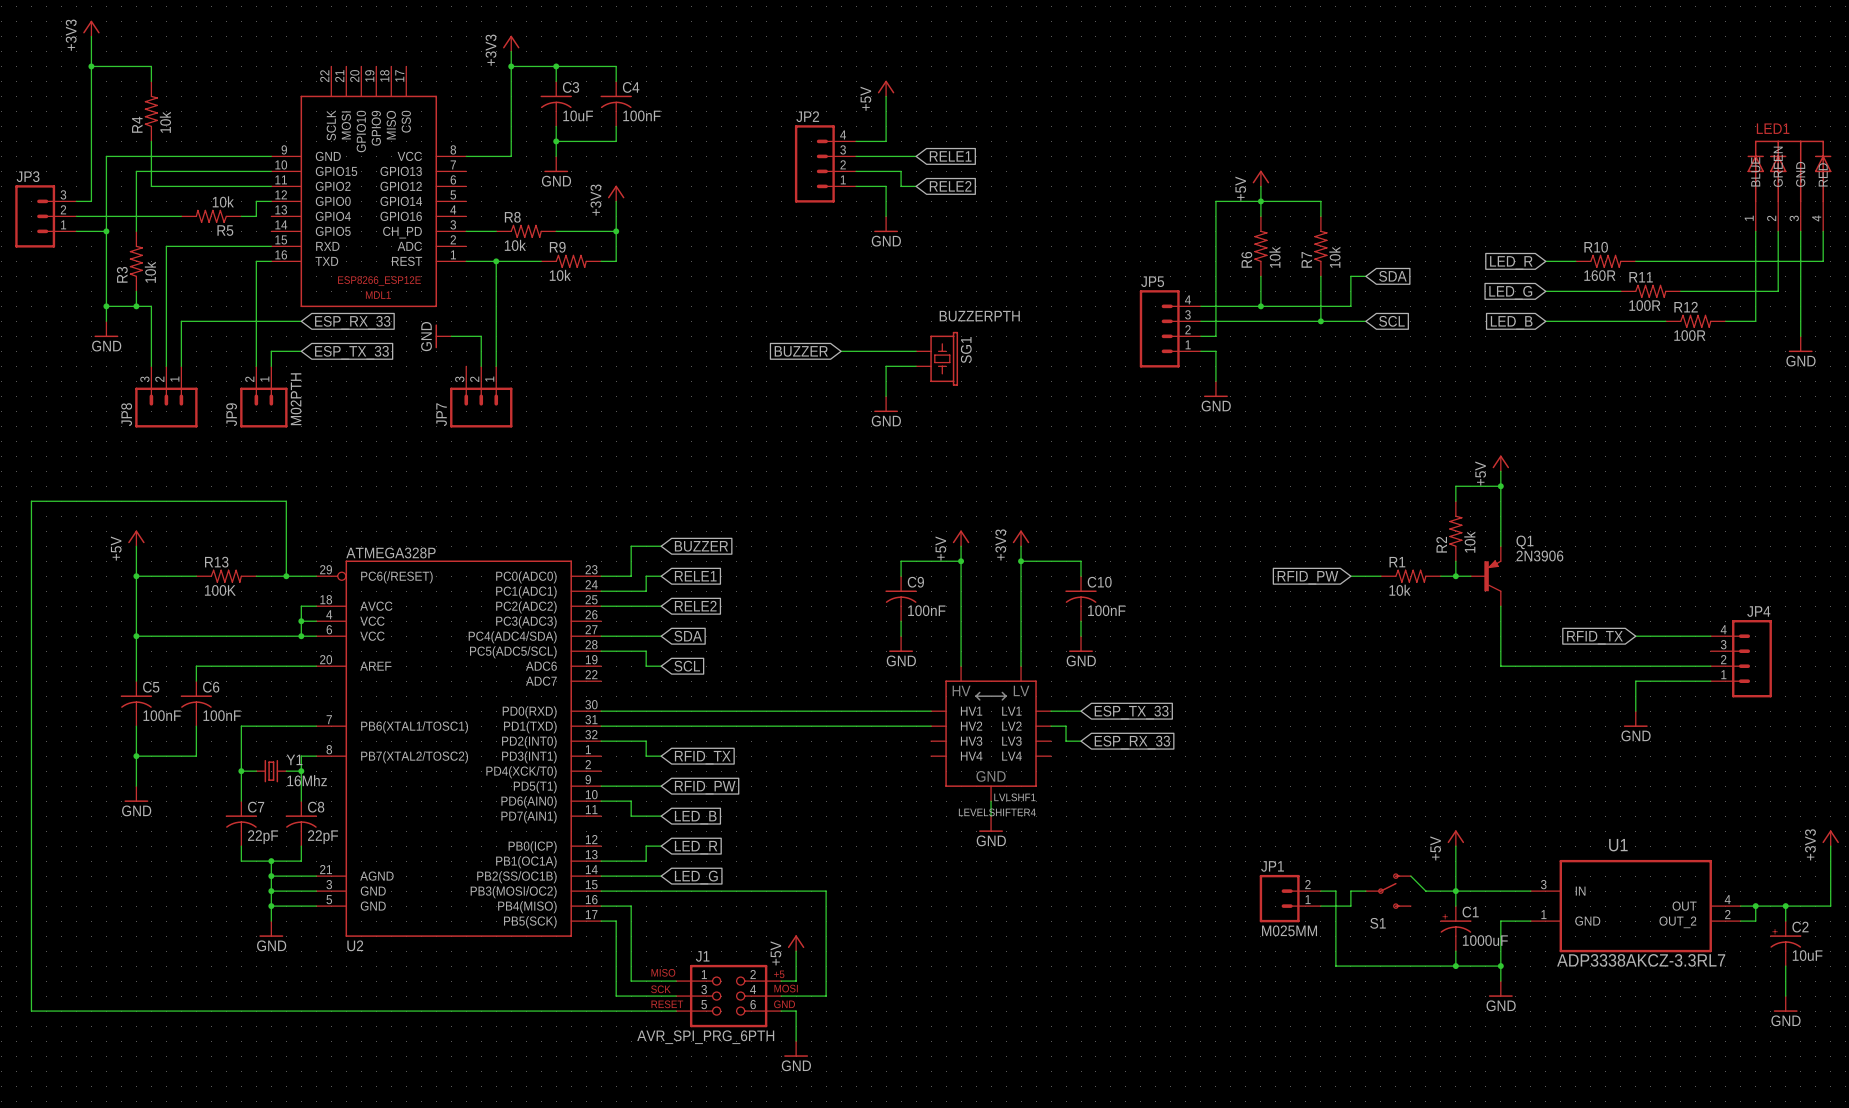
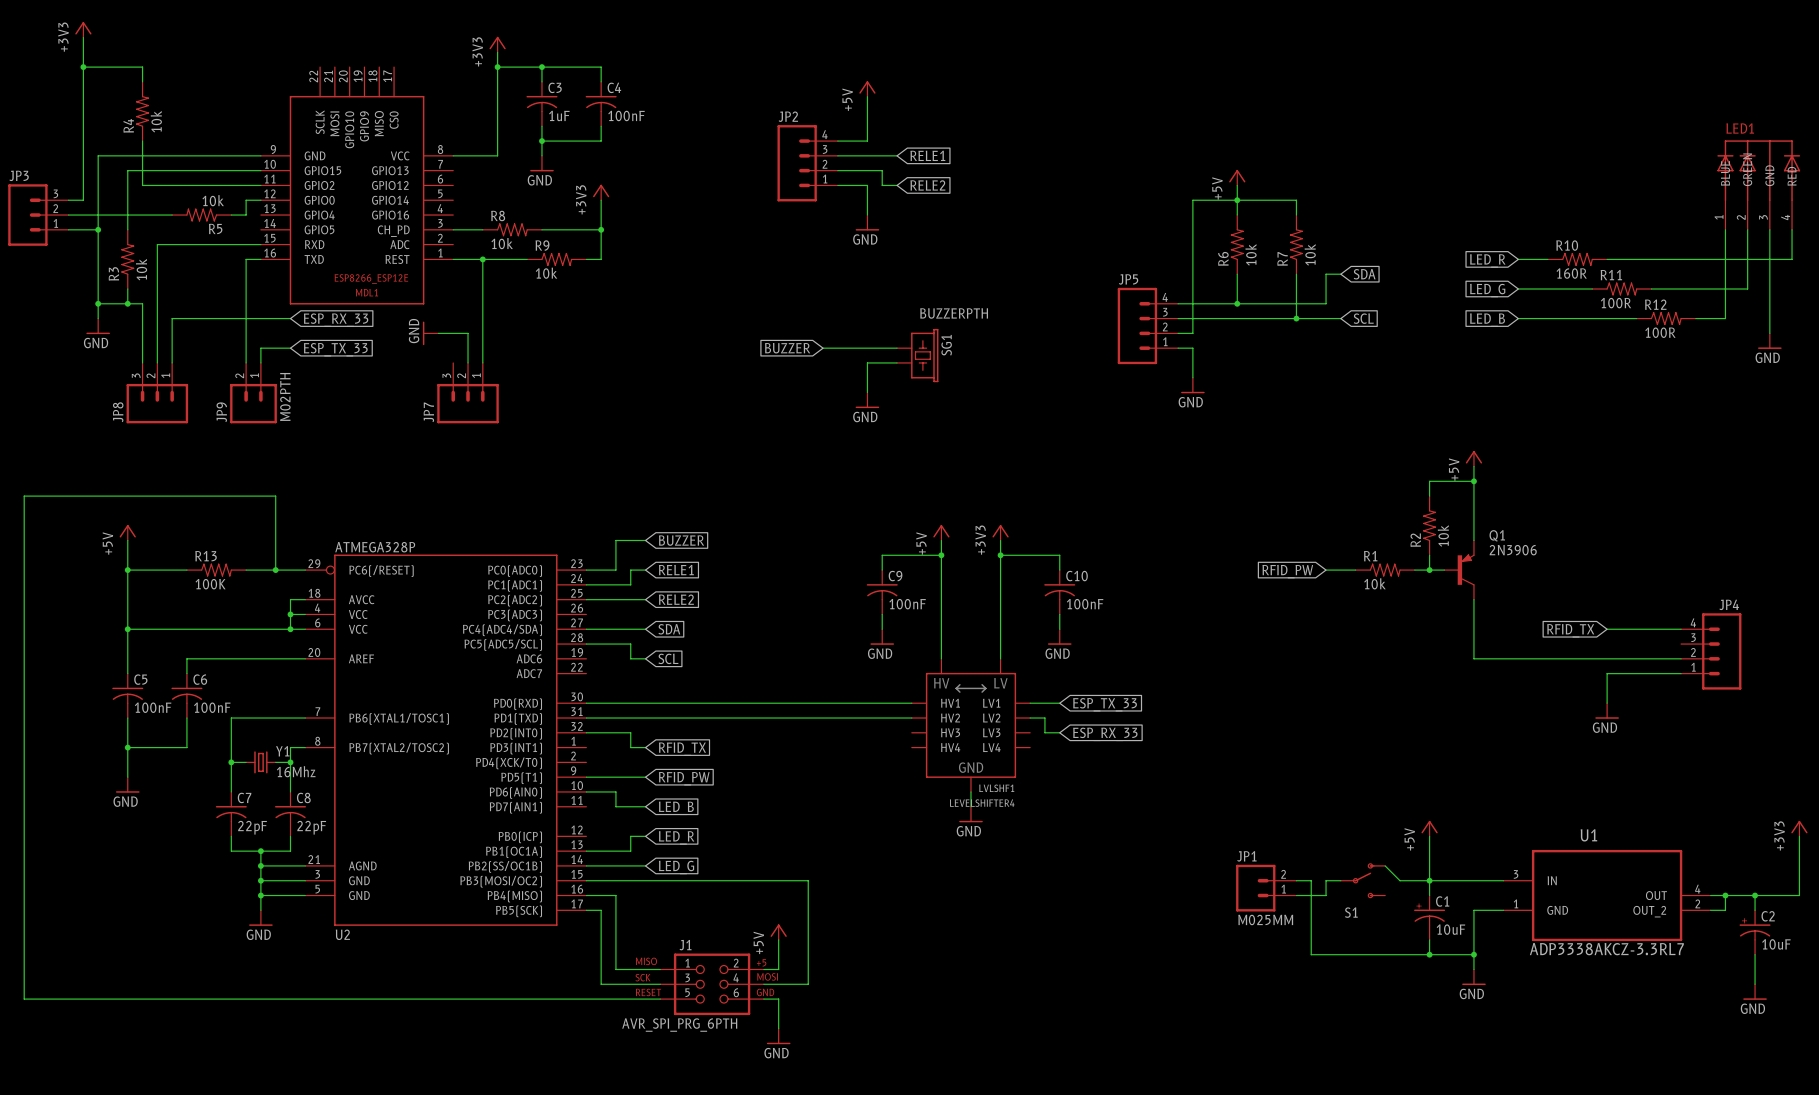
C3 value: 10uF (578, 115) -> 1uF (559, 115)
C1 value: 1000uF (1485, 940) -> 10uF (1450, 929)

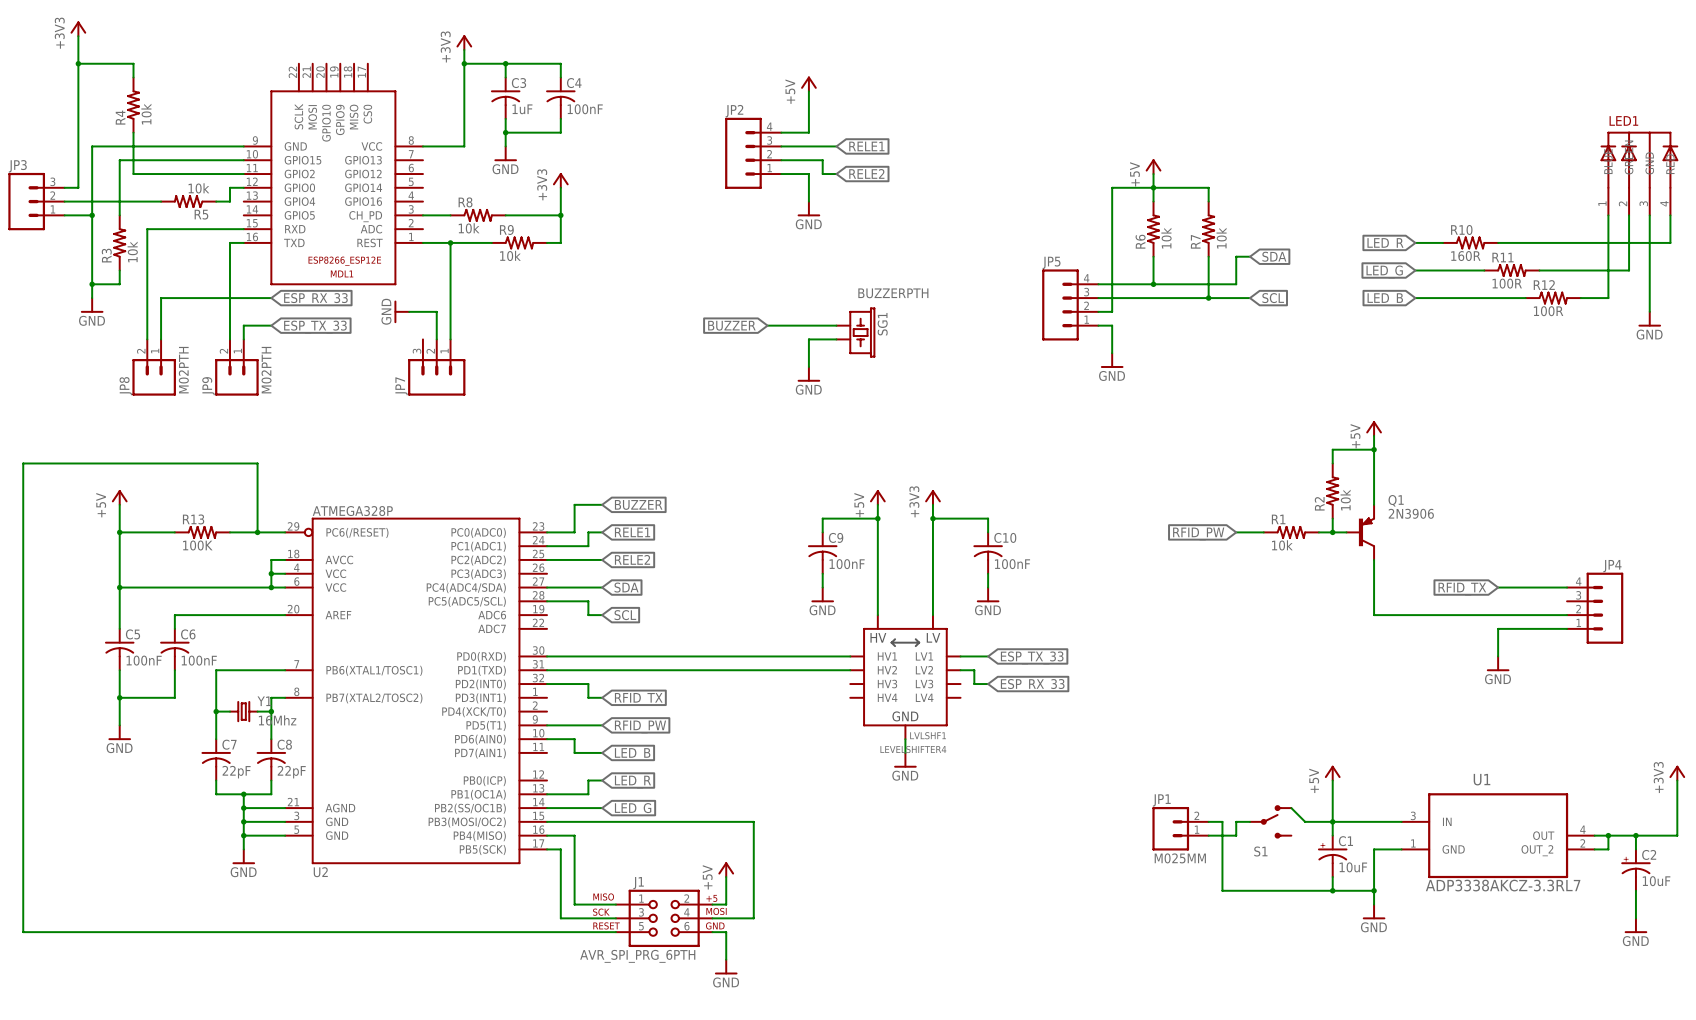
wire: (127, 303) (142, 303) (142, 362) -> none
junction: (127, 303) -> none
JP8 symbol: [126, 362, 189, 424] -> [132, 339, 176, 396]
JP8 value: none -> M02PTH (183, 370)

